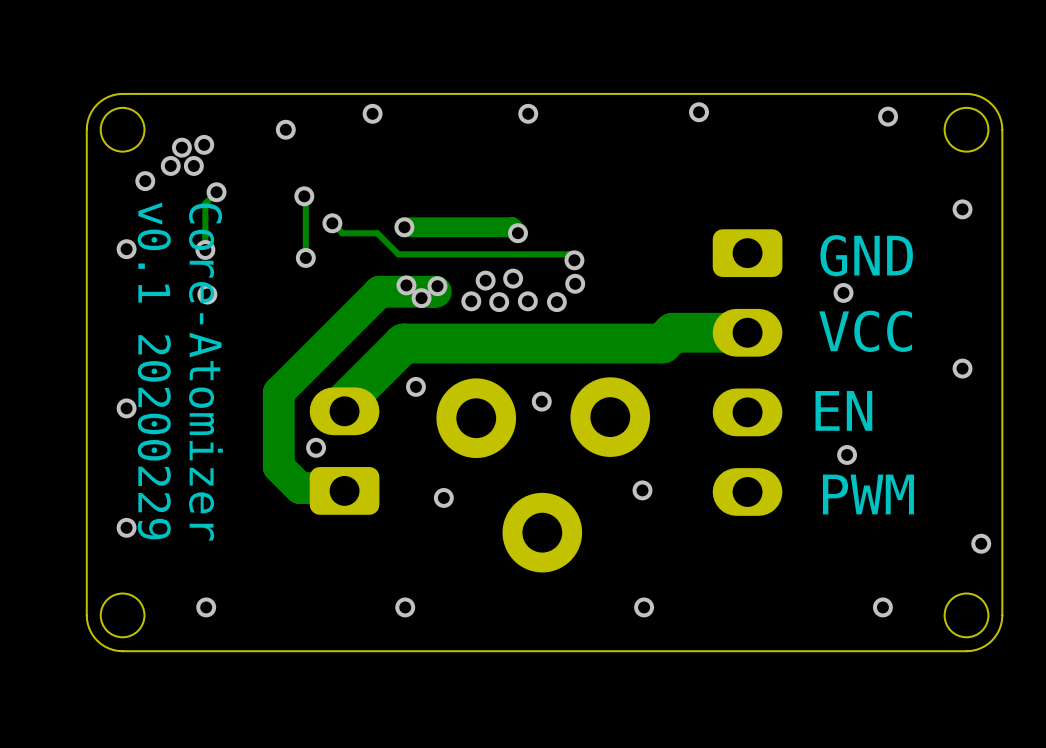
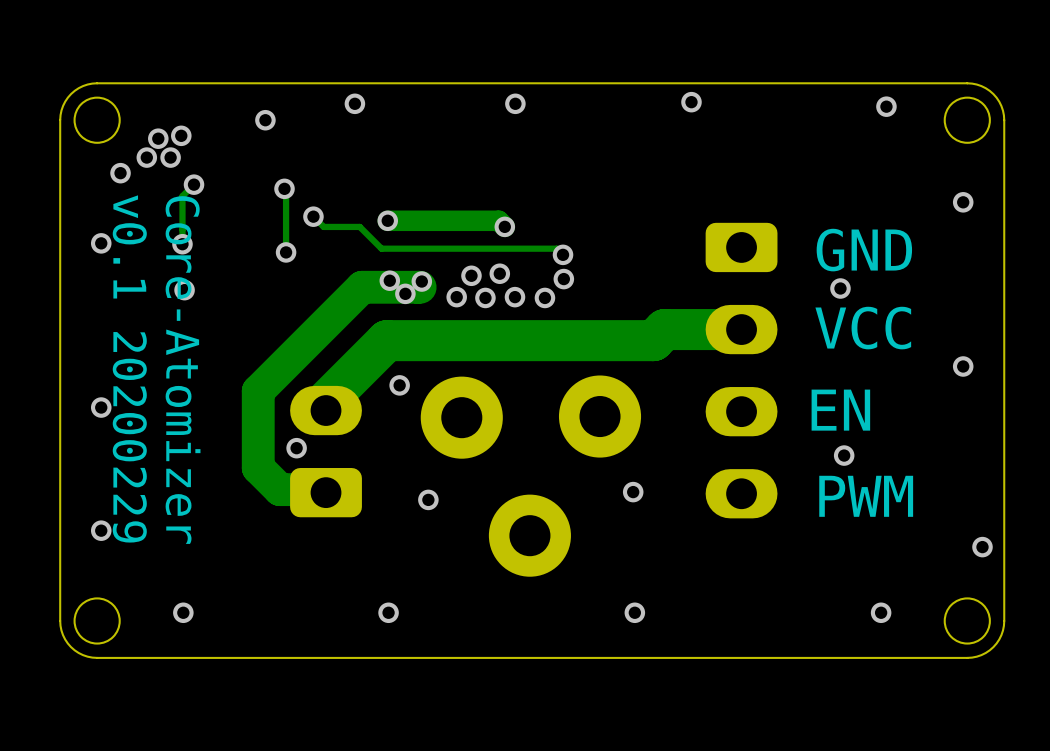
via: (541, 401) -> none

